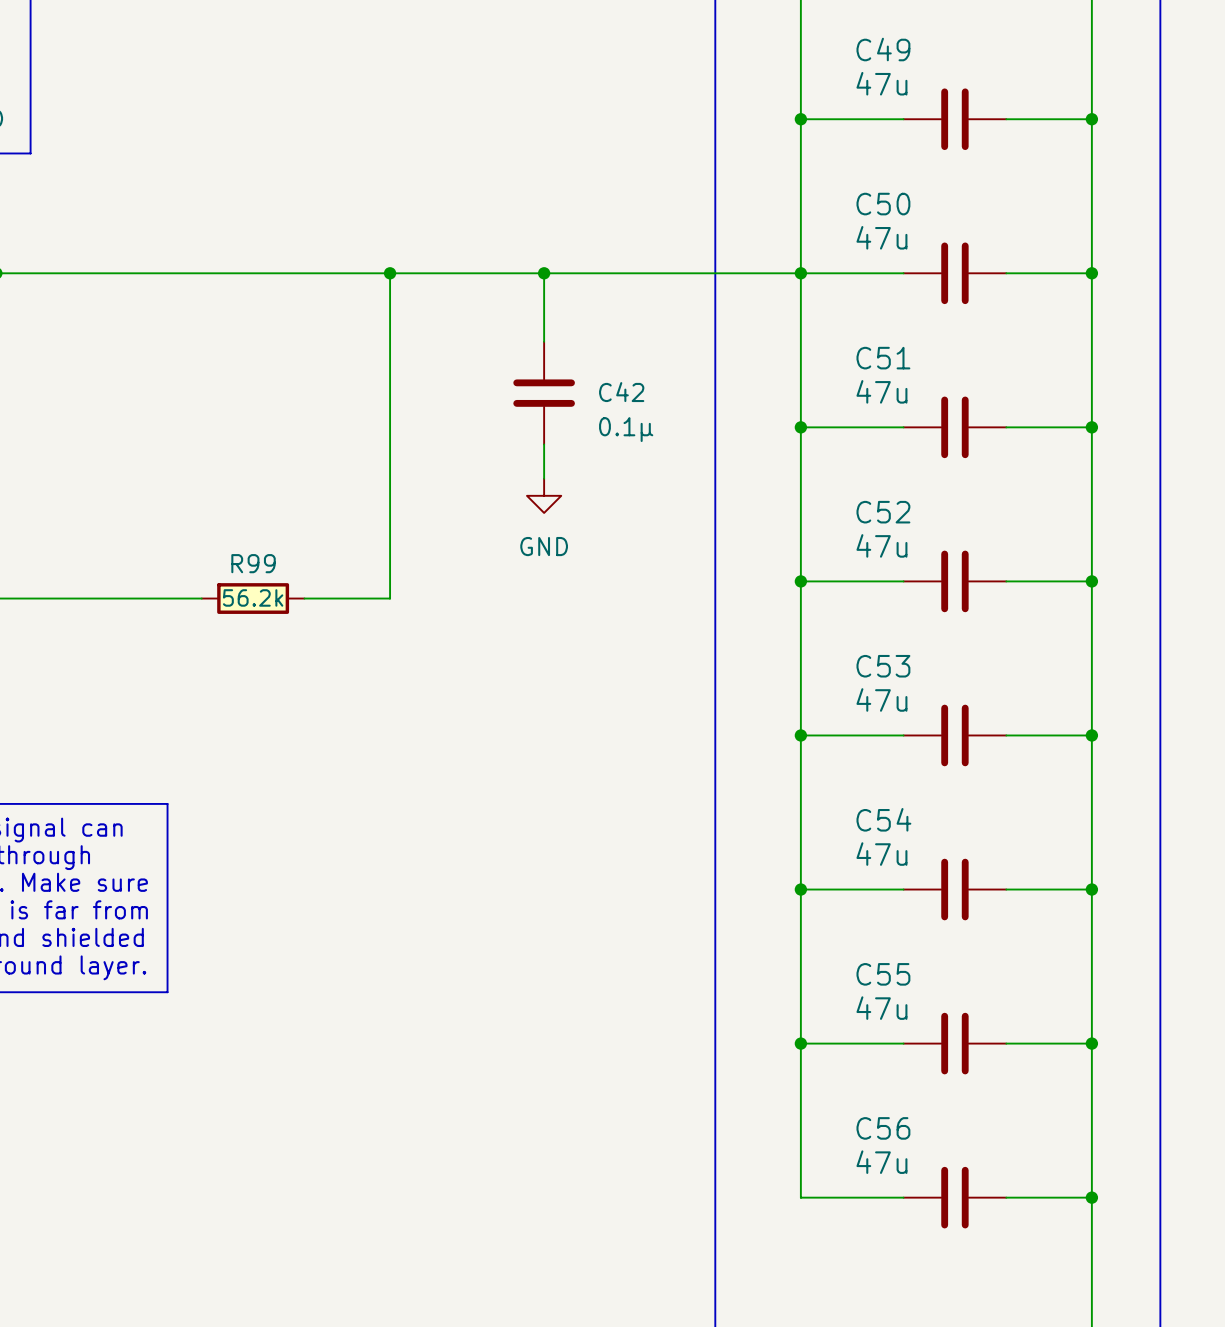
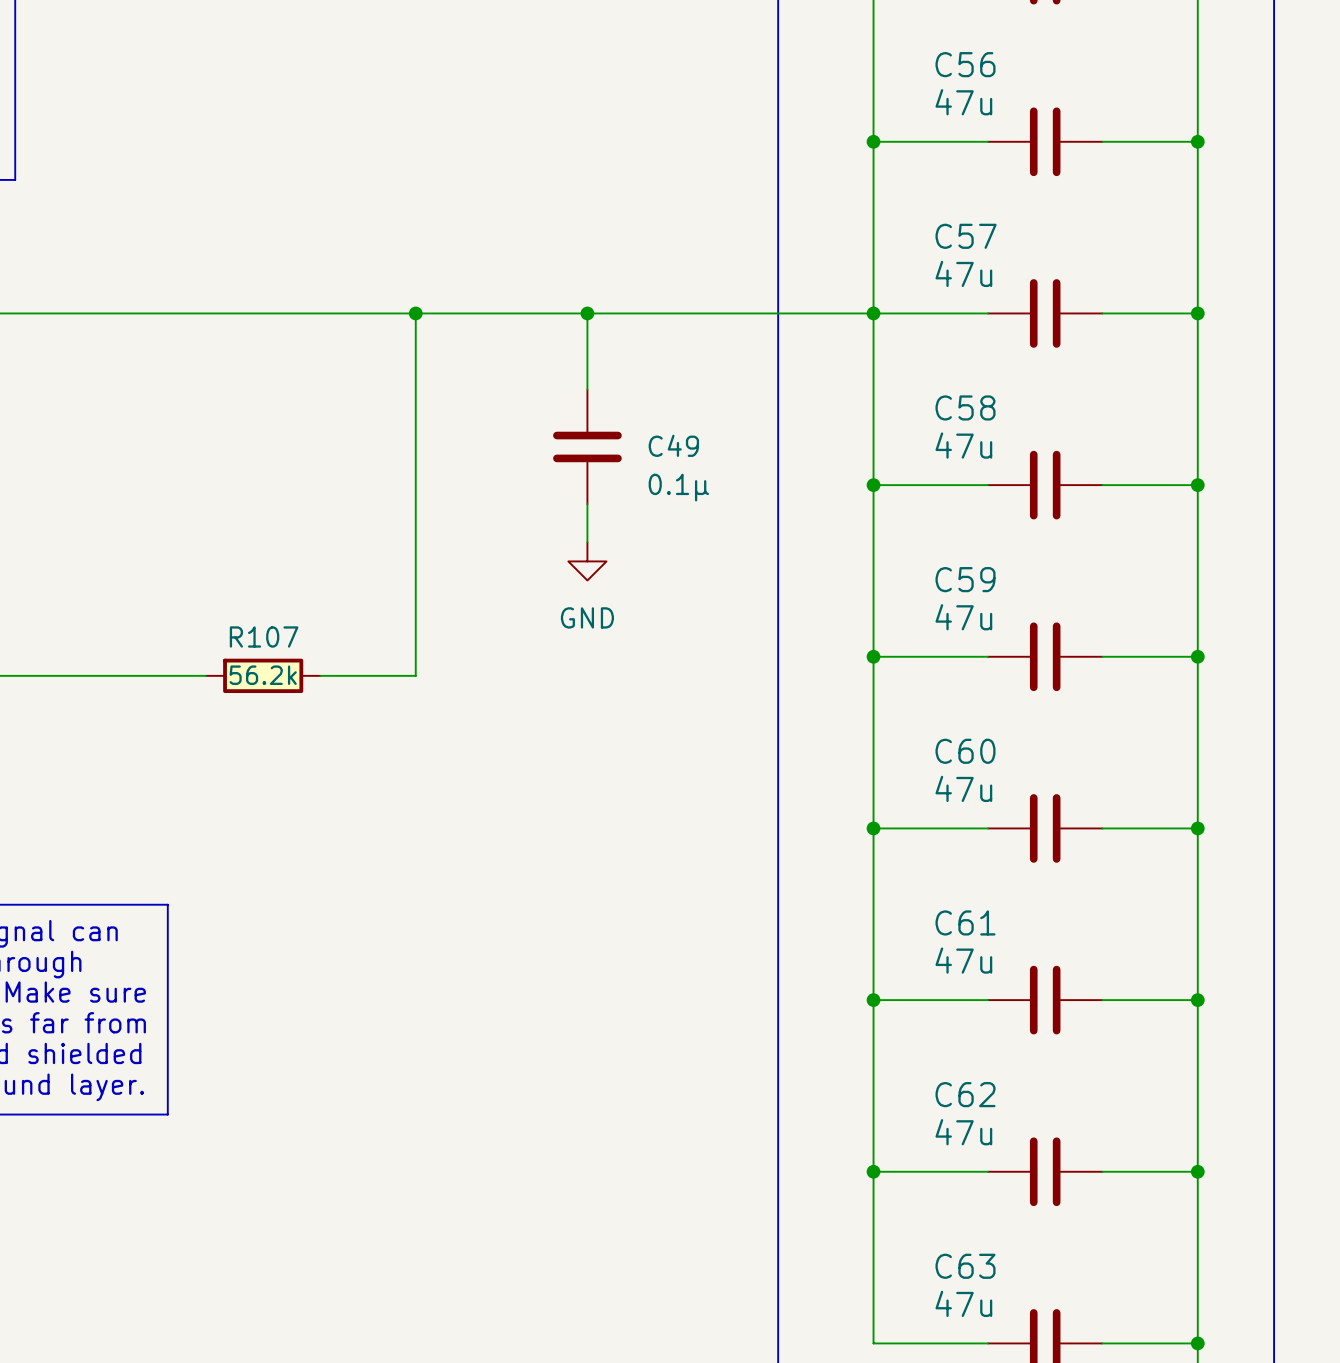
C49 name: C49 (883, 49) -> C56 (965, 64)
C50 name: C50 (883, 204) -> C57 (966, 236)
C51 name: C51 (883, 358) -> C58 (965, 407)
C42 name: C42 (621, 392) -> C49 (673, 445)
C52 name: C52 (883, 512) -> C59 (965, 579)
R99 name: R99 (253, 563) -> R107 (264, 636)
C53 name: C53 (883, 666) -> C60 (965, 751)
C54 name: C54 (883, 819) -> C61 (965, 922)
C55 name: C55 (883, 974) -> C62 (965, 1094)
C56 name: C56 (883, 1128) -> C63 (965, 1266)

